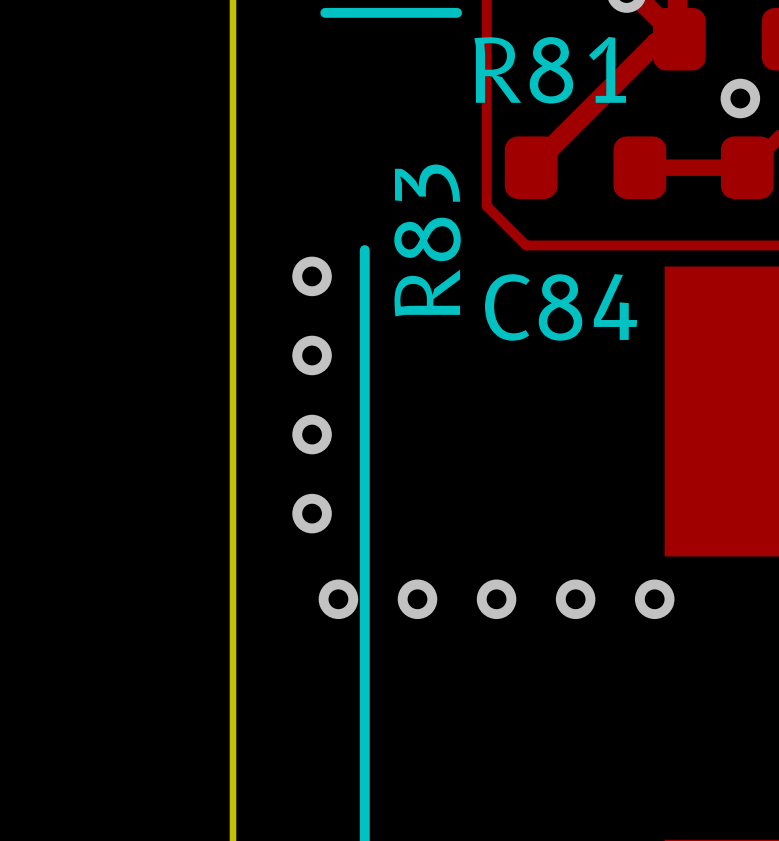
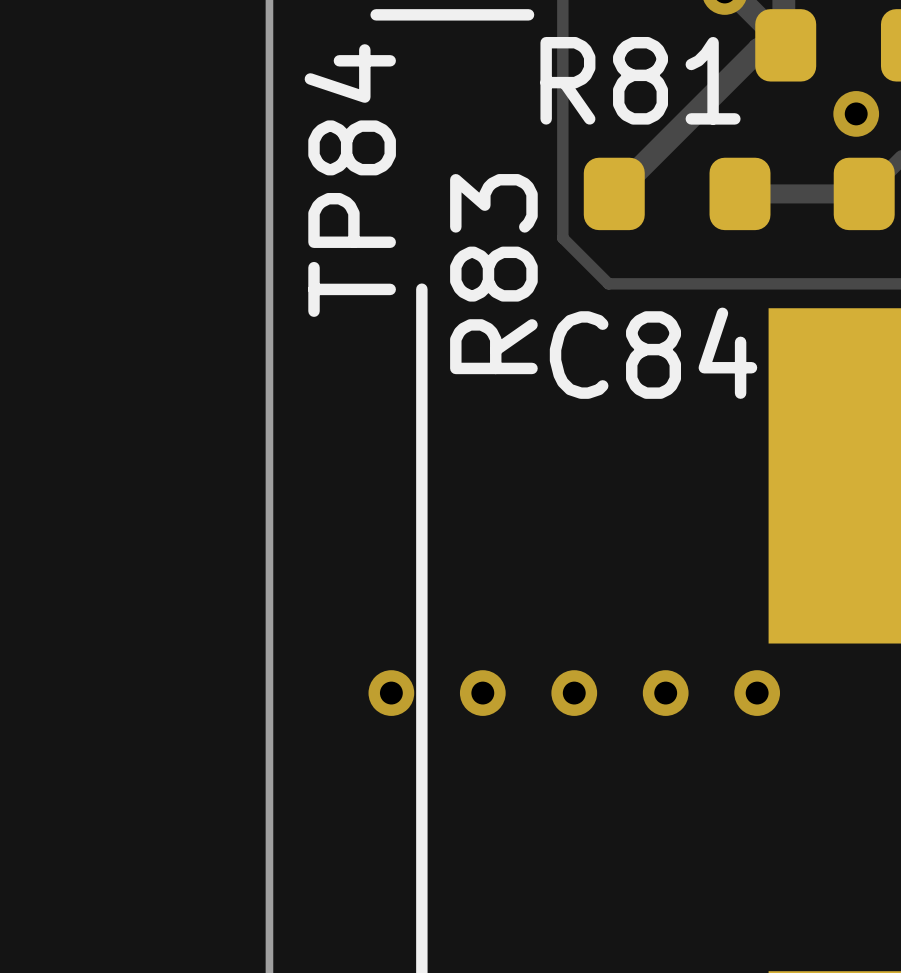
TP84 name: none -> TP84 (350, 180)
via: (312, 276) -> none
via: (312, 355) -> none
via: (312, 434) -> none
via: (312, 513) -> none

